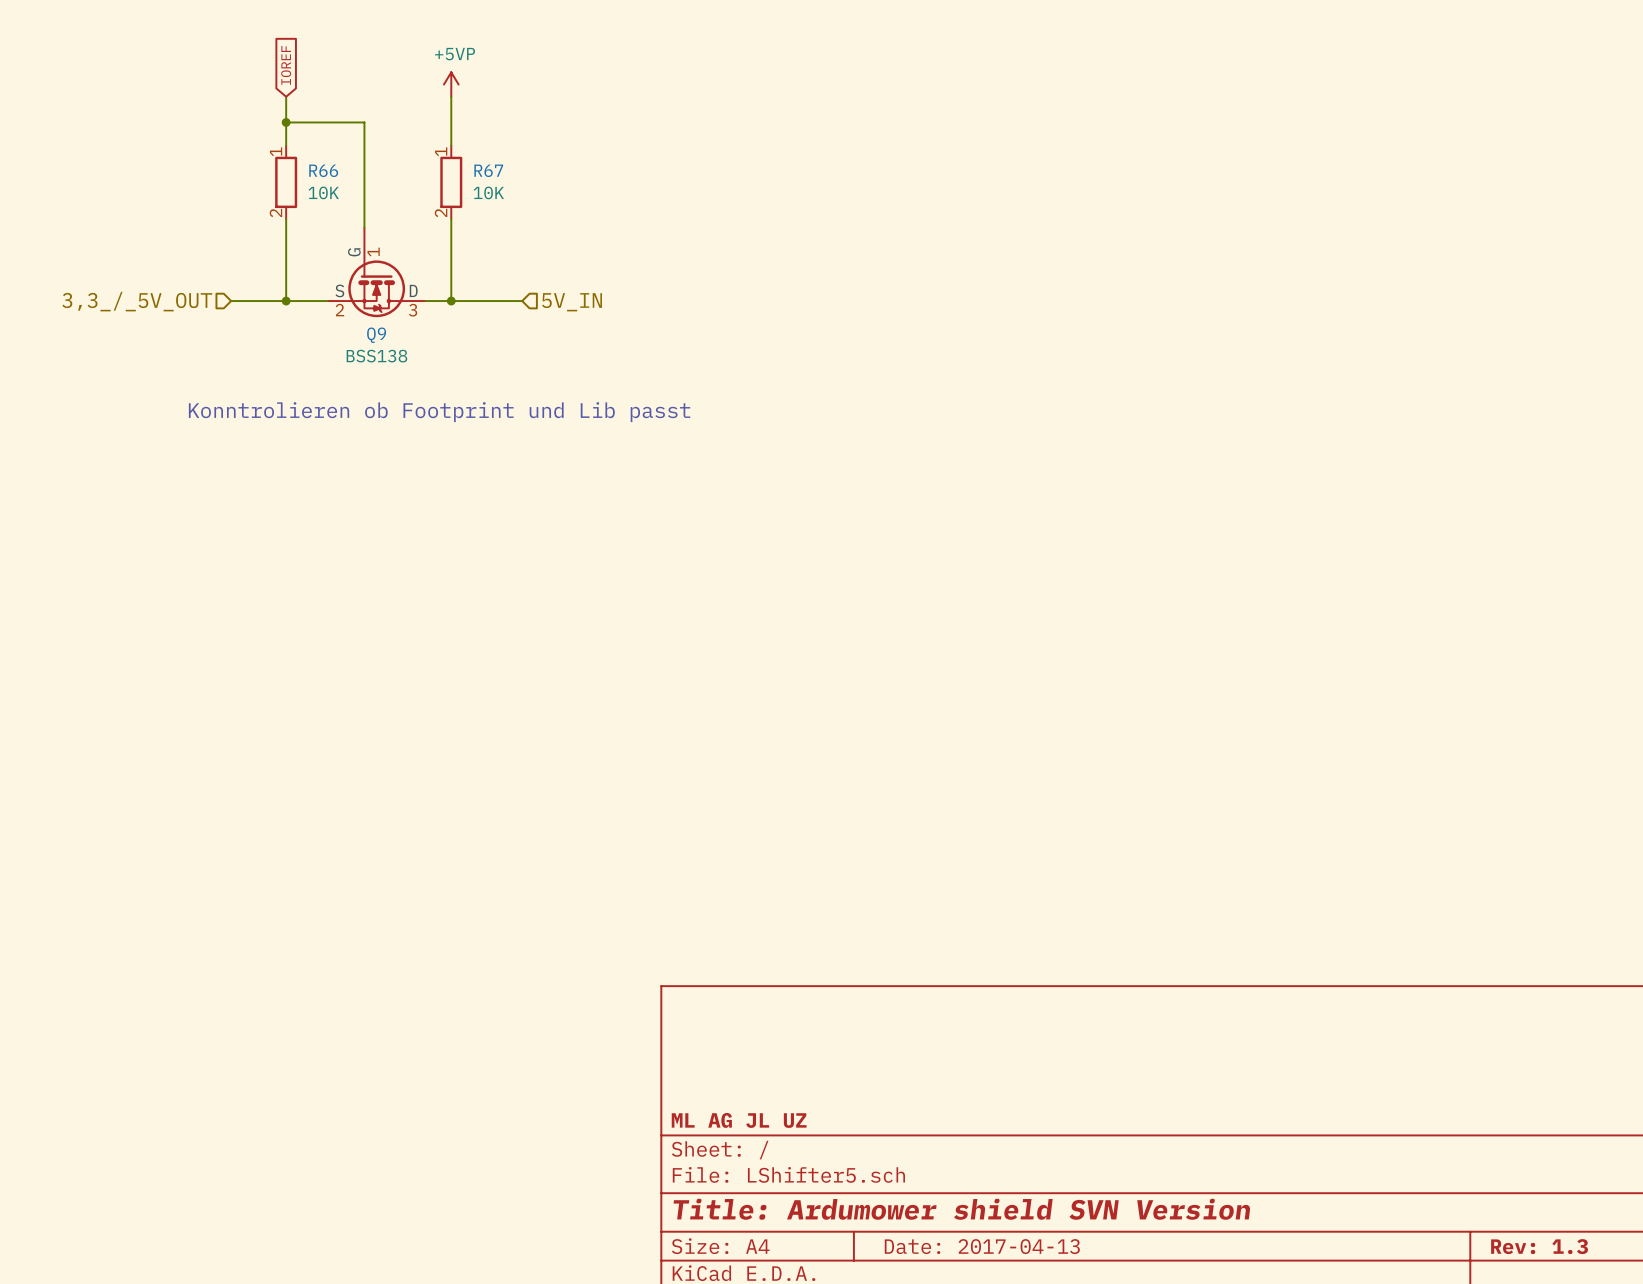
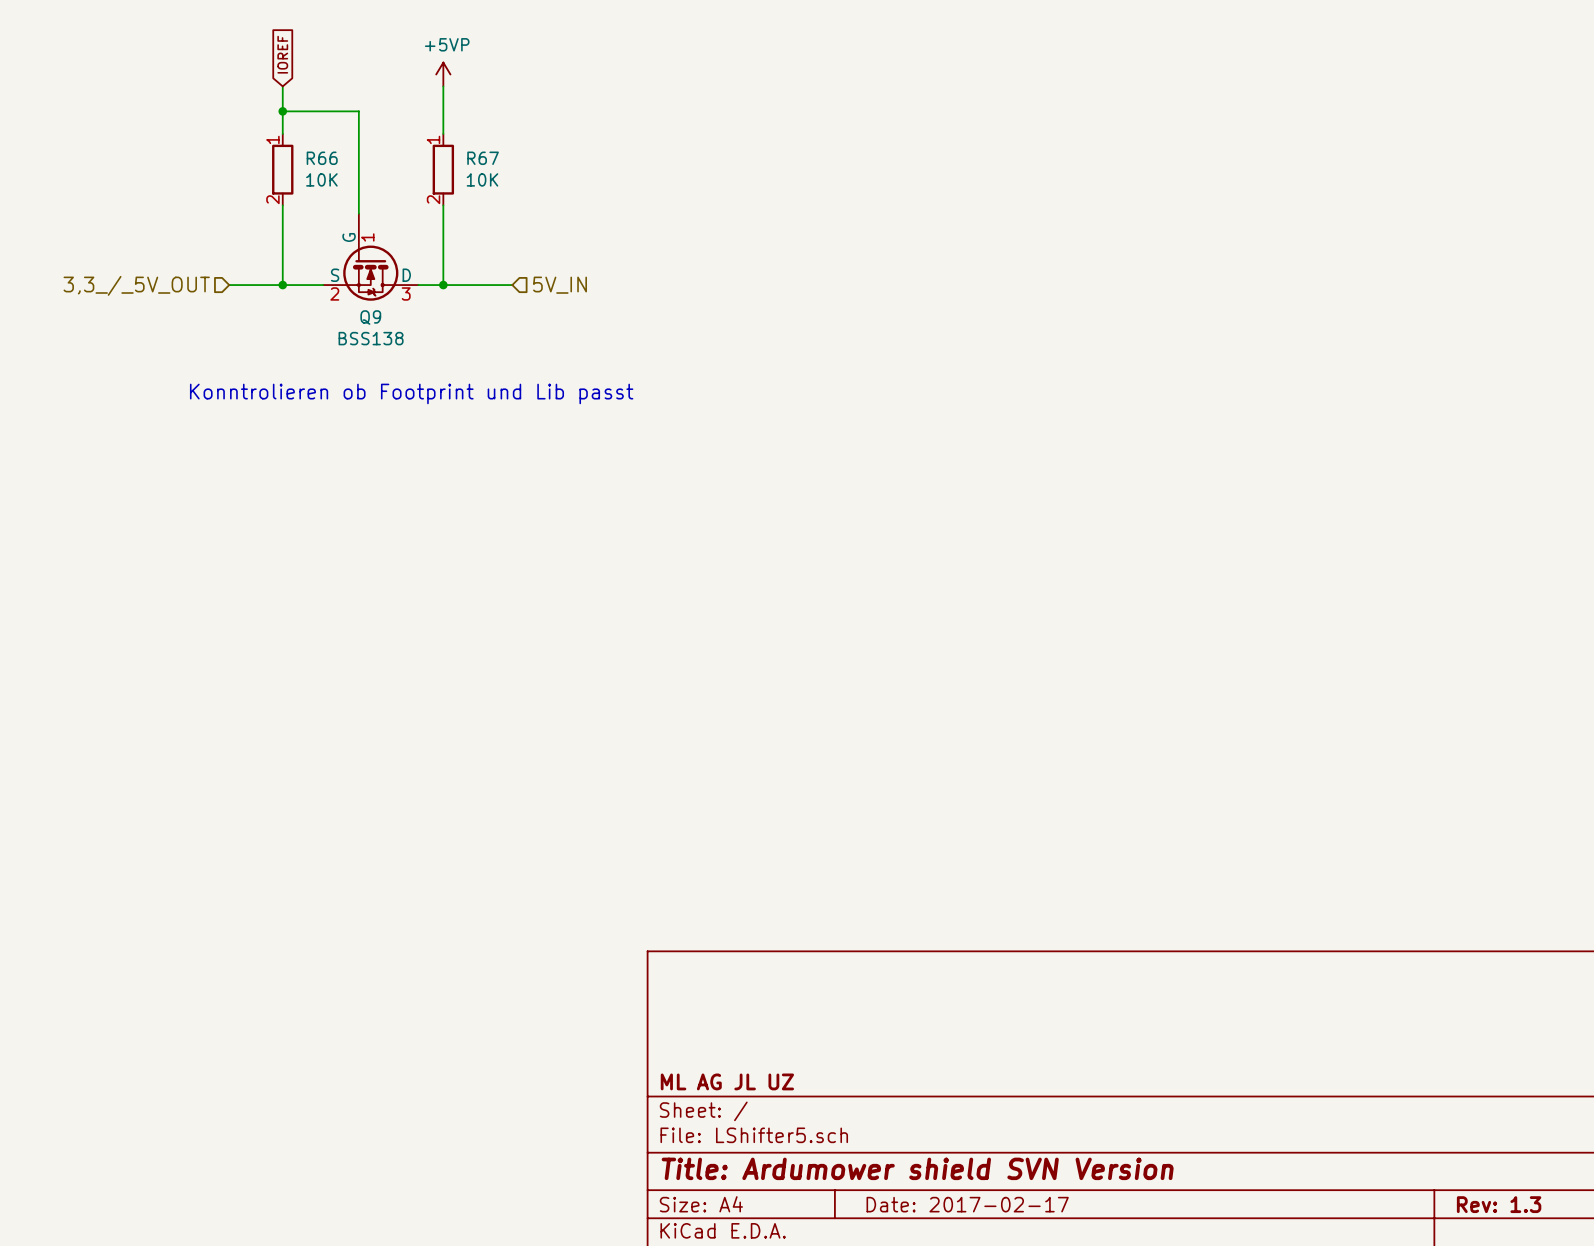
title block: Date: 2017-04-13 (982, 1246) -> Date: 2017-02-17 (967, 1204)

